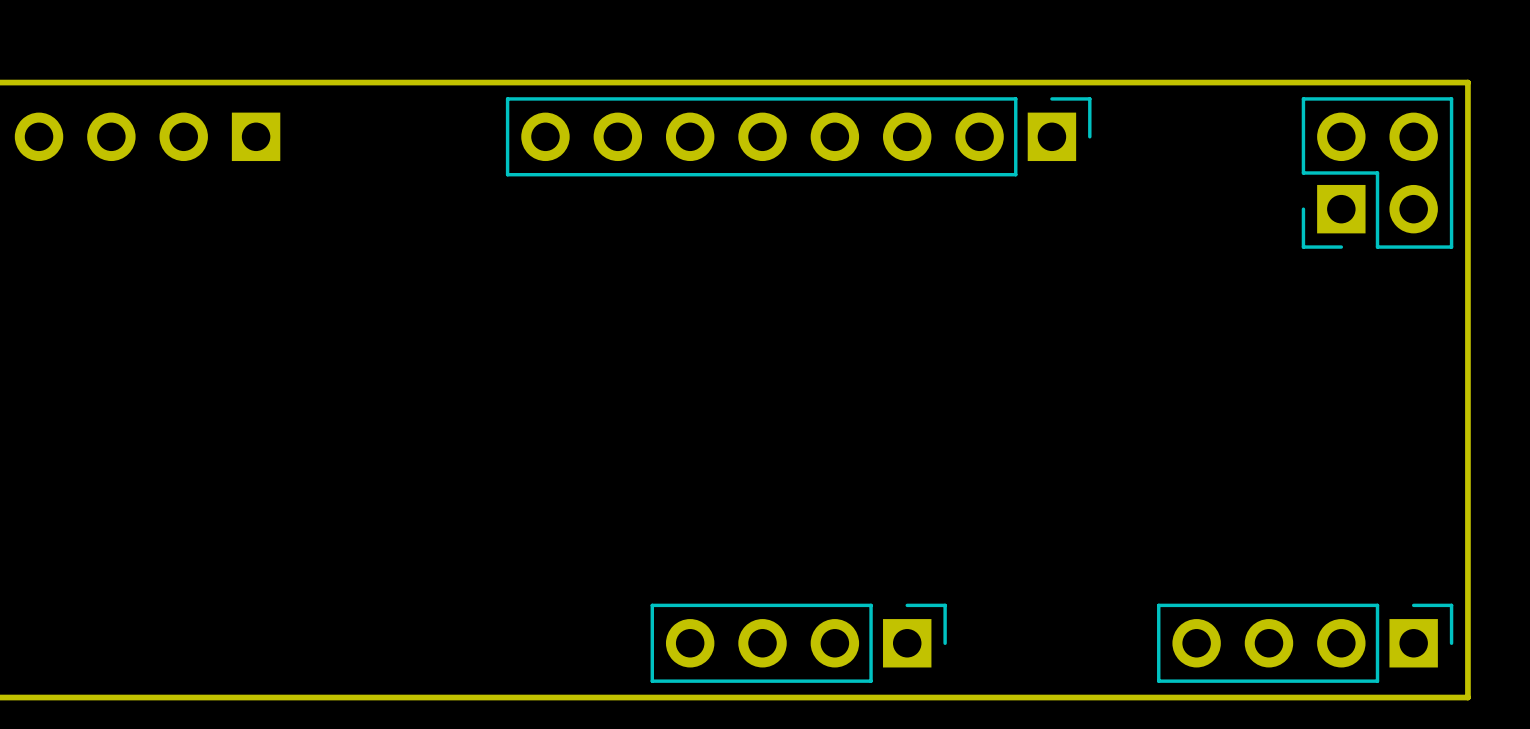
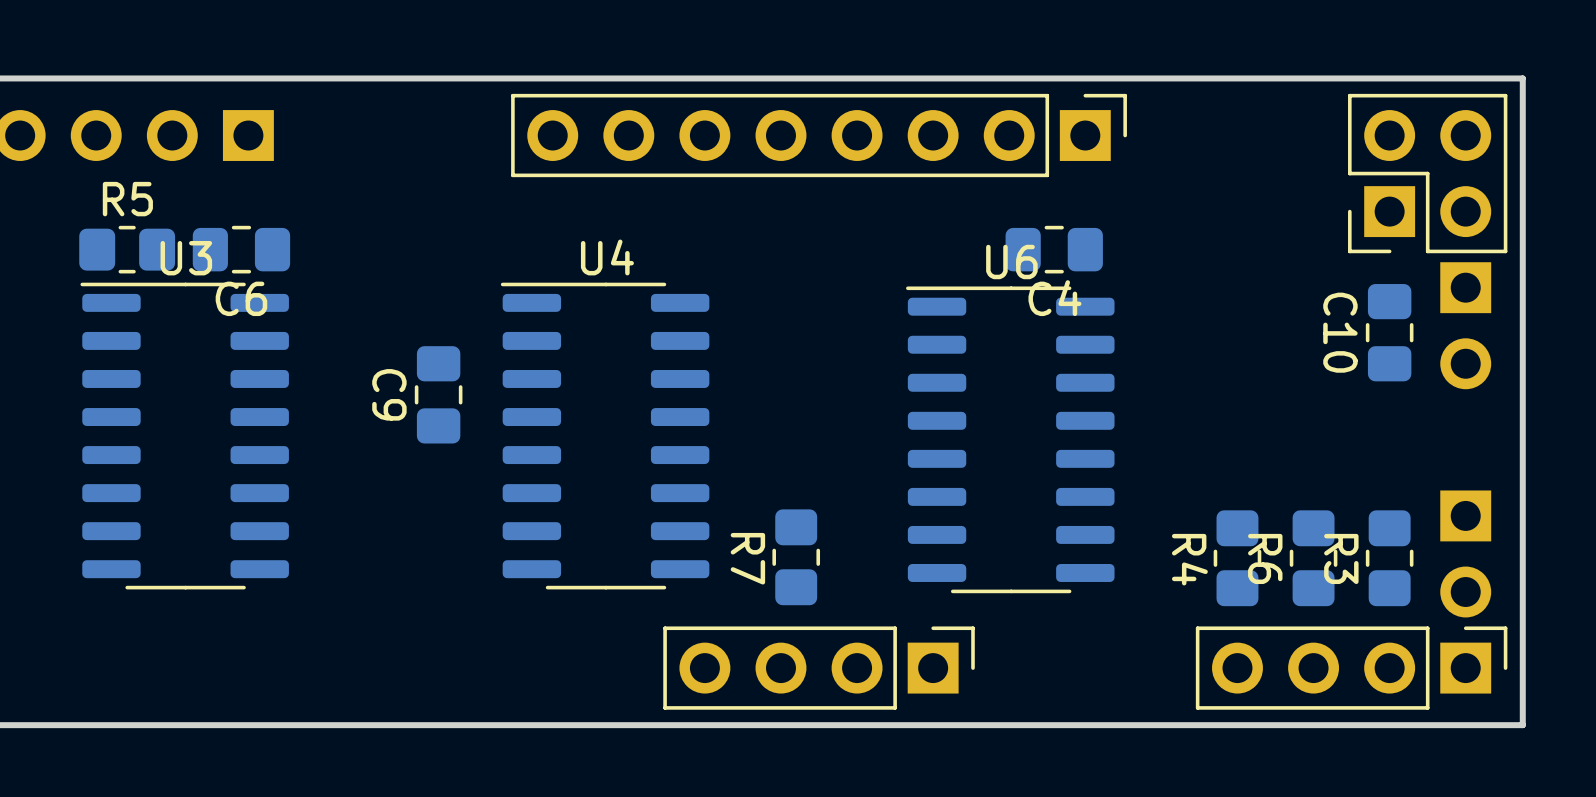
R5: none -> (127, 249)
C6: none -> (241, 249)
C4: none -> (1054, 249)
part: none -> (1465, 325)
C10: none -> (1389, 332)
C9: none -> (438, 394)
U3: none -> (184, 436)
U4: none -> (605, 436)
U6: none -> (1010, 439)
part: none -> (1465, 553)
R7: none -> (796, 557)
R4: none -> (1237, 558)
R6: none -> (1313, 558)
R3: none -> (1389, 558)

